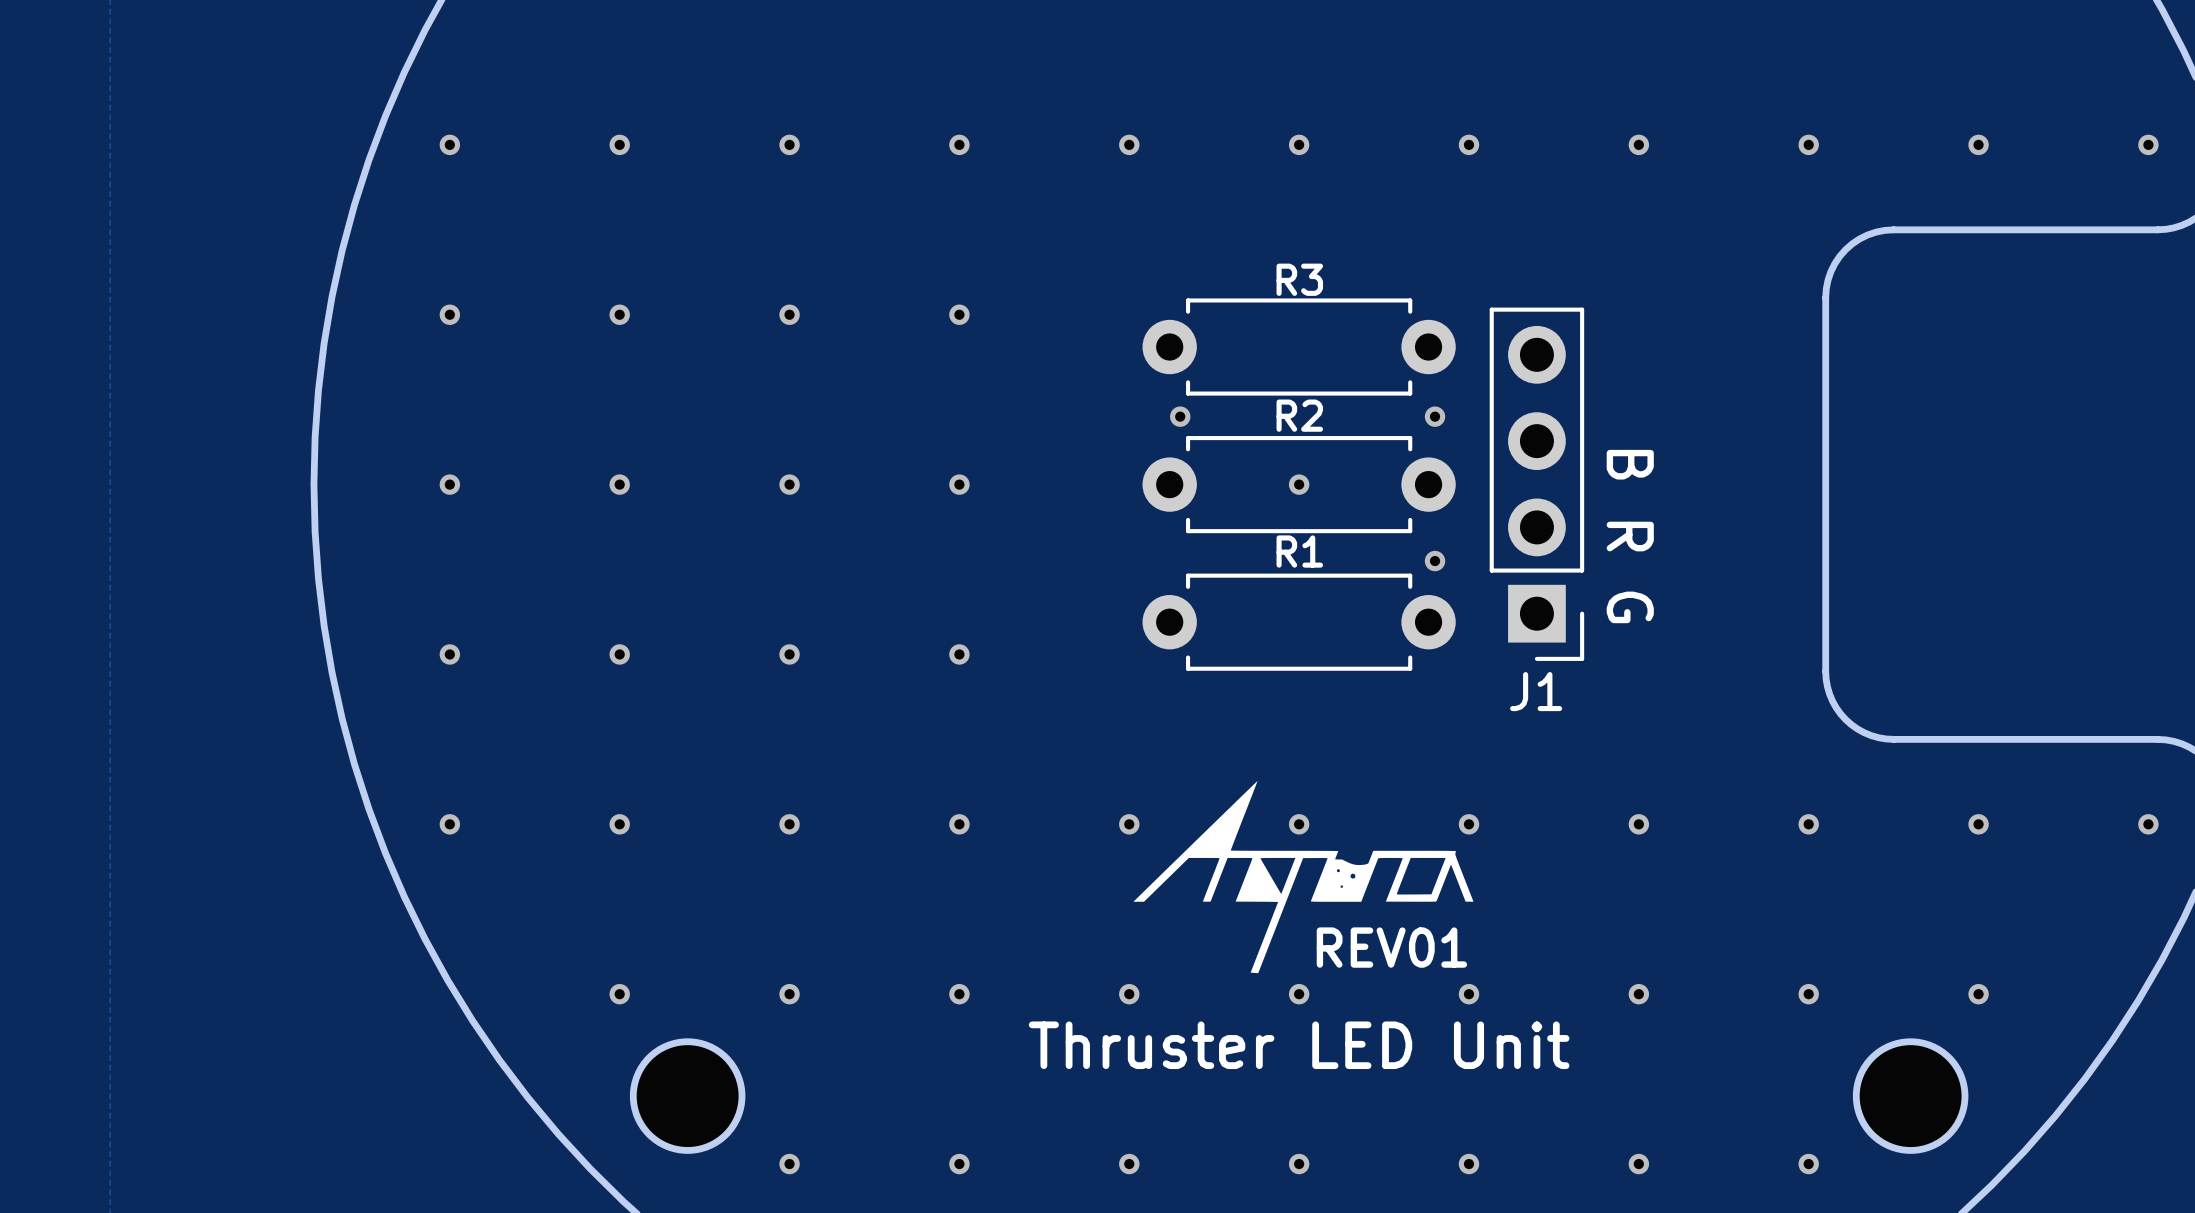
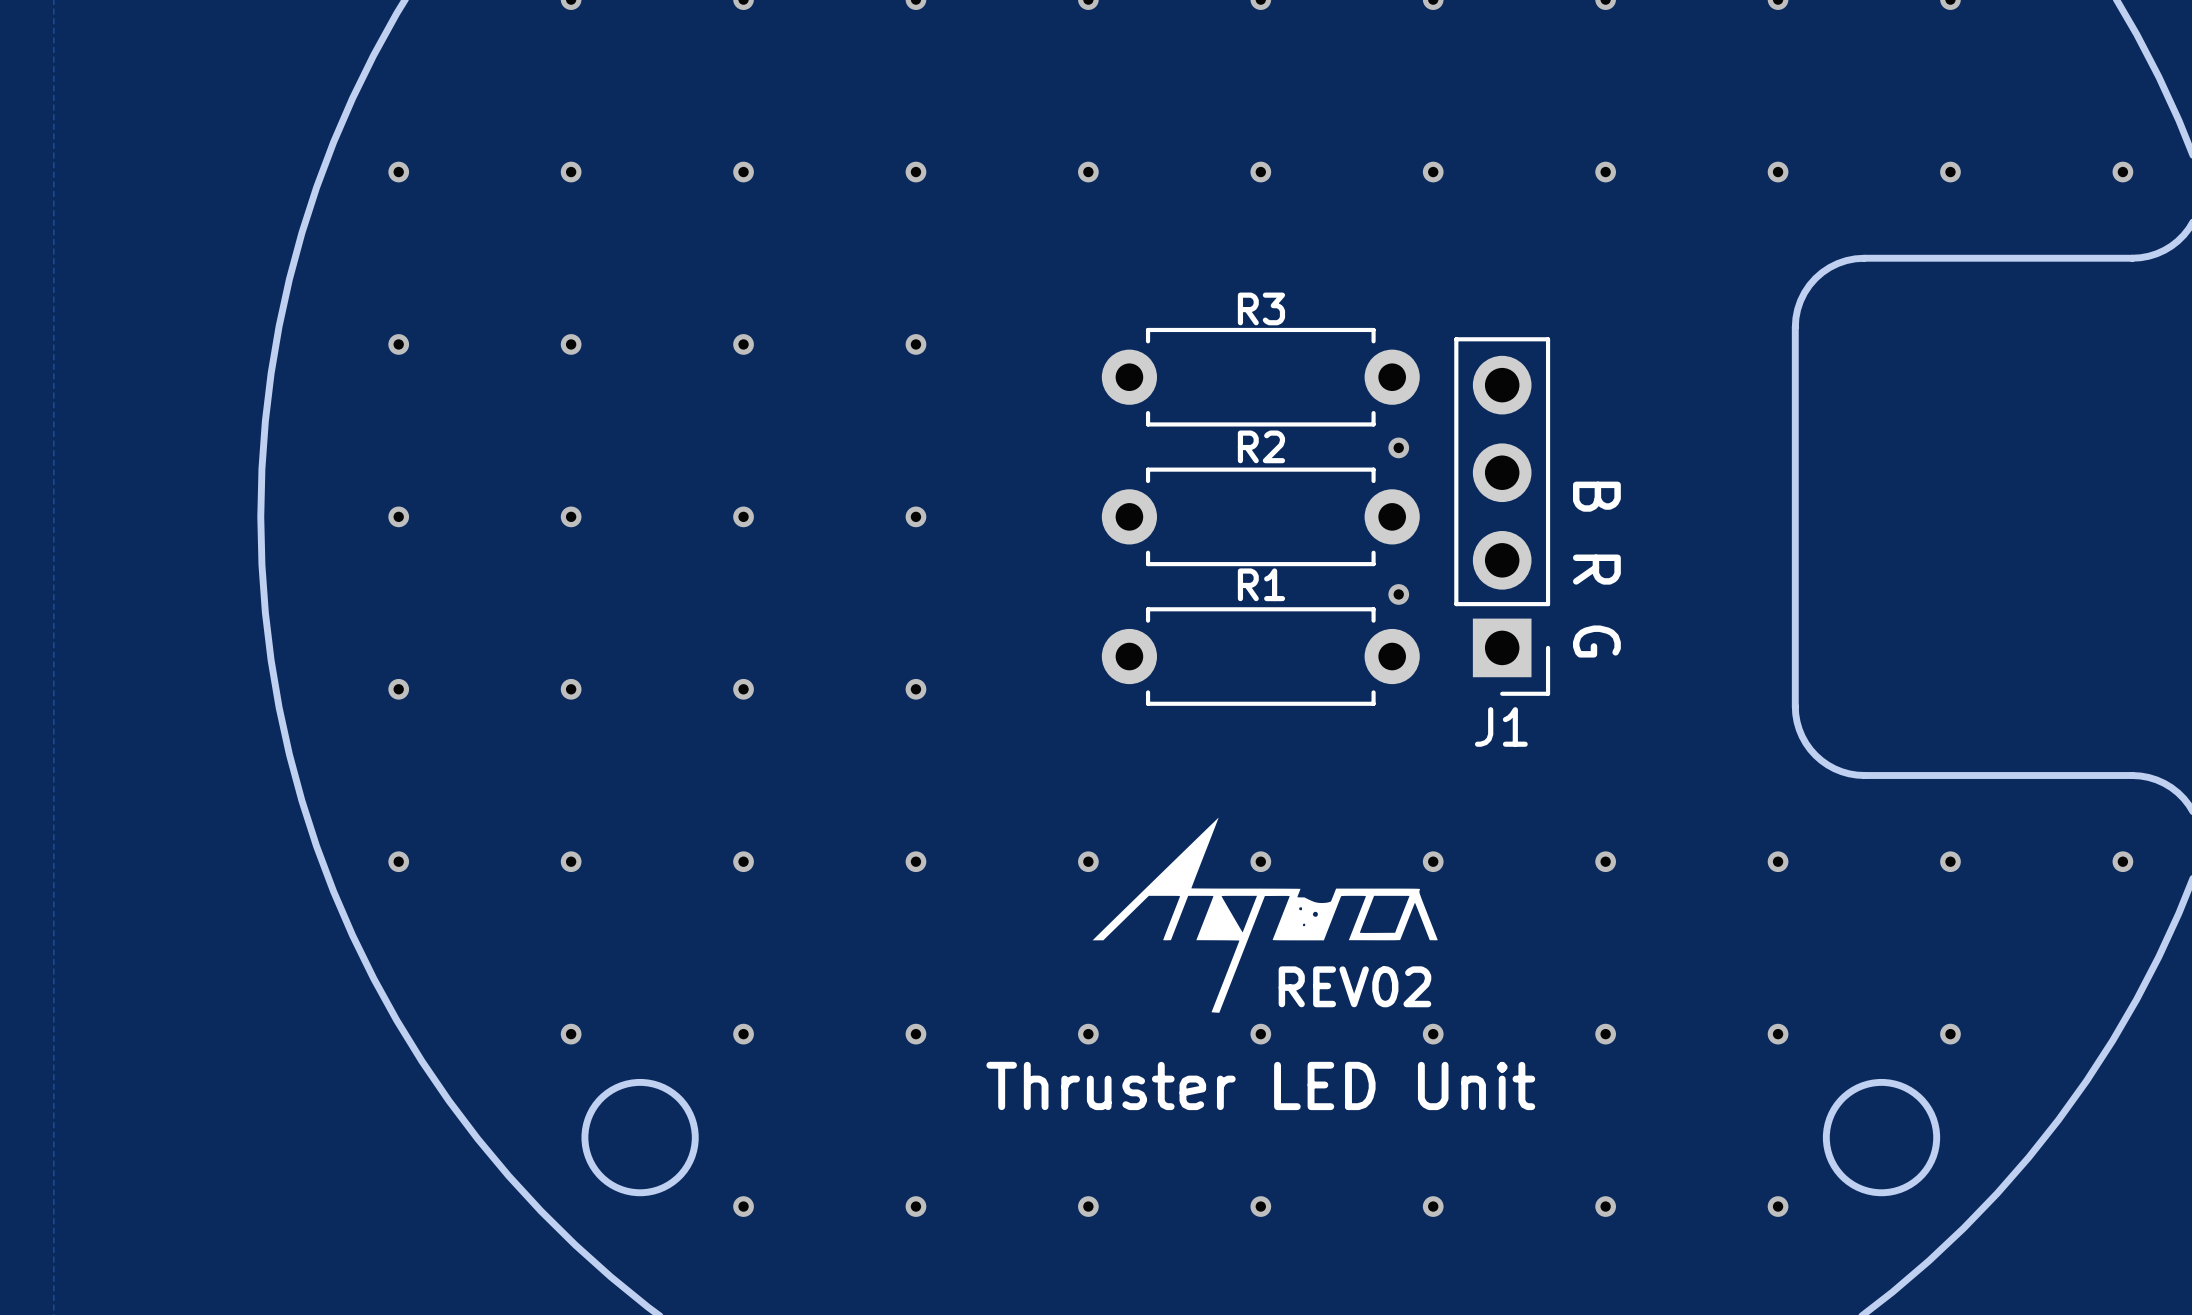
via: (1180, 416) -> none
via: (1299, 484) -> none
text: REV01 (1391, 947) -> REV02 (1354, 986)
part: (687, 1096) -> none
part: (1910, 1096) -> none

